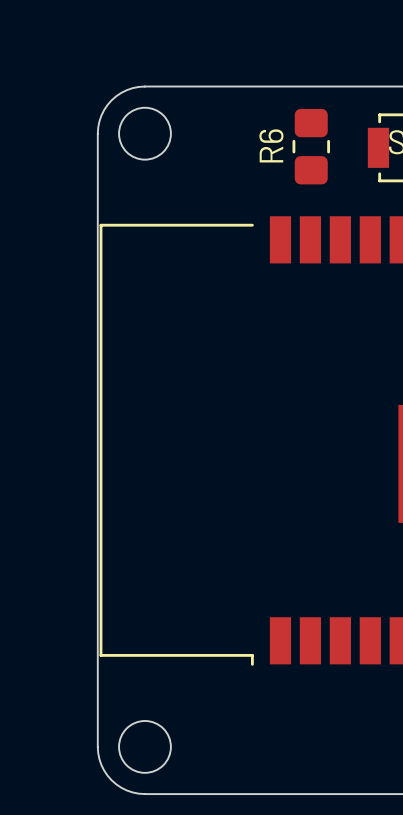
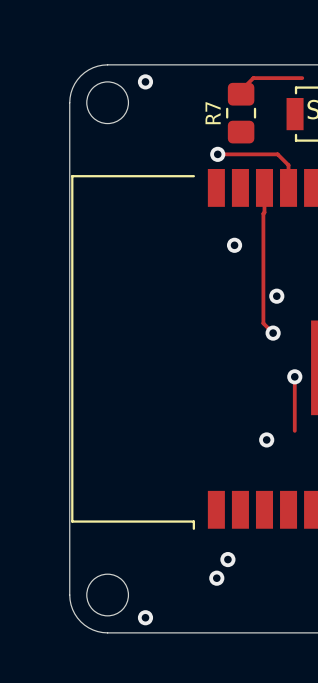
track: none -> (302, 78) (253, 78) (241, 90) (241, 94)
via: none -> (145, 81)
R6 name: R6 (271, 145) -> R7 (213, 113)
track: none -> (217, 154) (277, 154) (288, 165) (288, 187)
via: none -> (217, 154)
track: none -> (264, 187) (263, 323) (273, 333)
via: none -> (234, 245)
via: none -> (276, 296)
via: none -> (273, 333)
track: none -> (294, 376) (294, 430)
via: none -> (294, 376)
via: none -> (266, 439)
via: none -> (227, 559)
via: none -> (216, 578)
via: none -> (145, 617)

